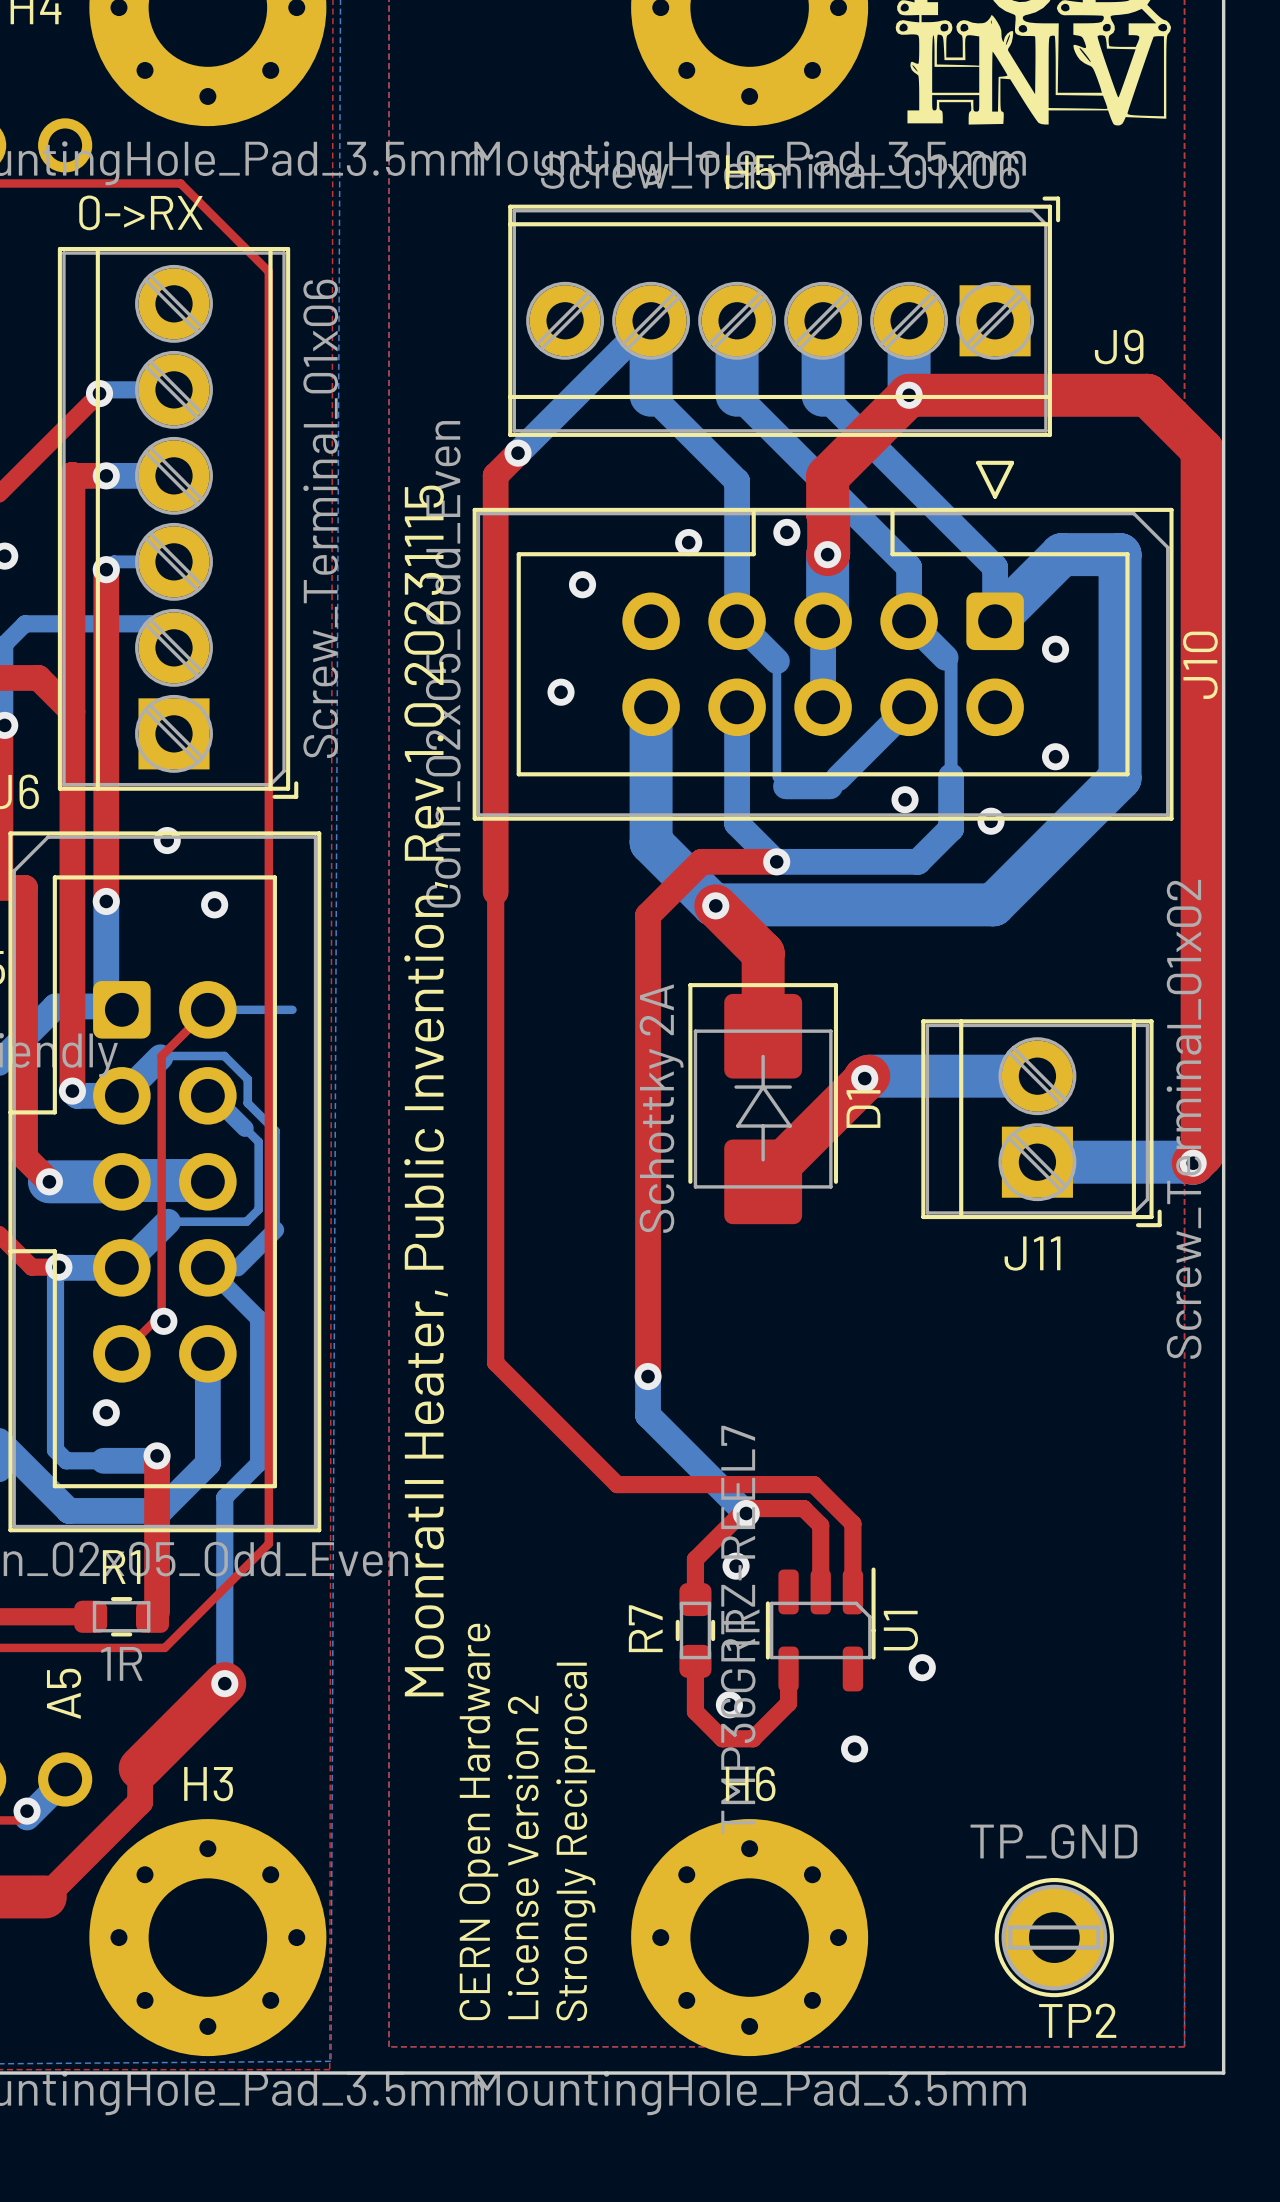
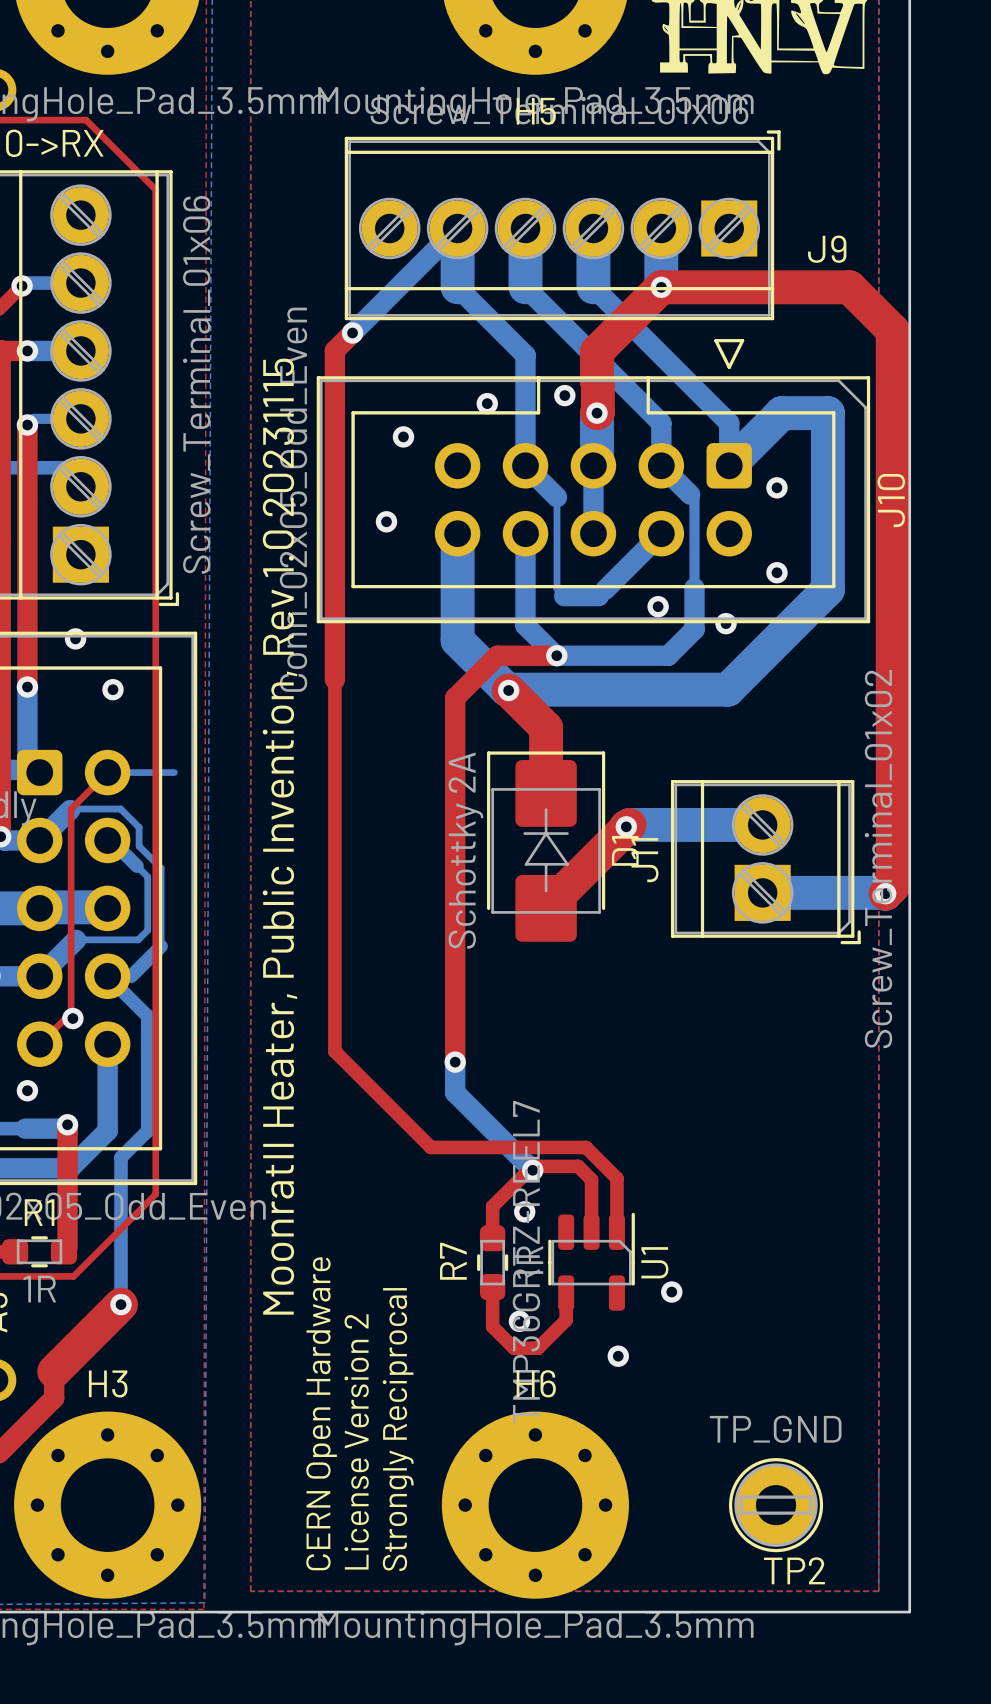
J11 name rotation: 0° (1032, 1253) -> 90° counterclockwise (644, 860)
J11 name position: J11 (1032, 1253) -> J11 (644, 860)

